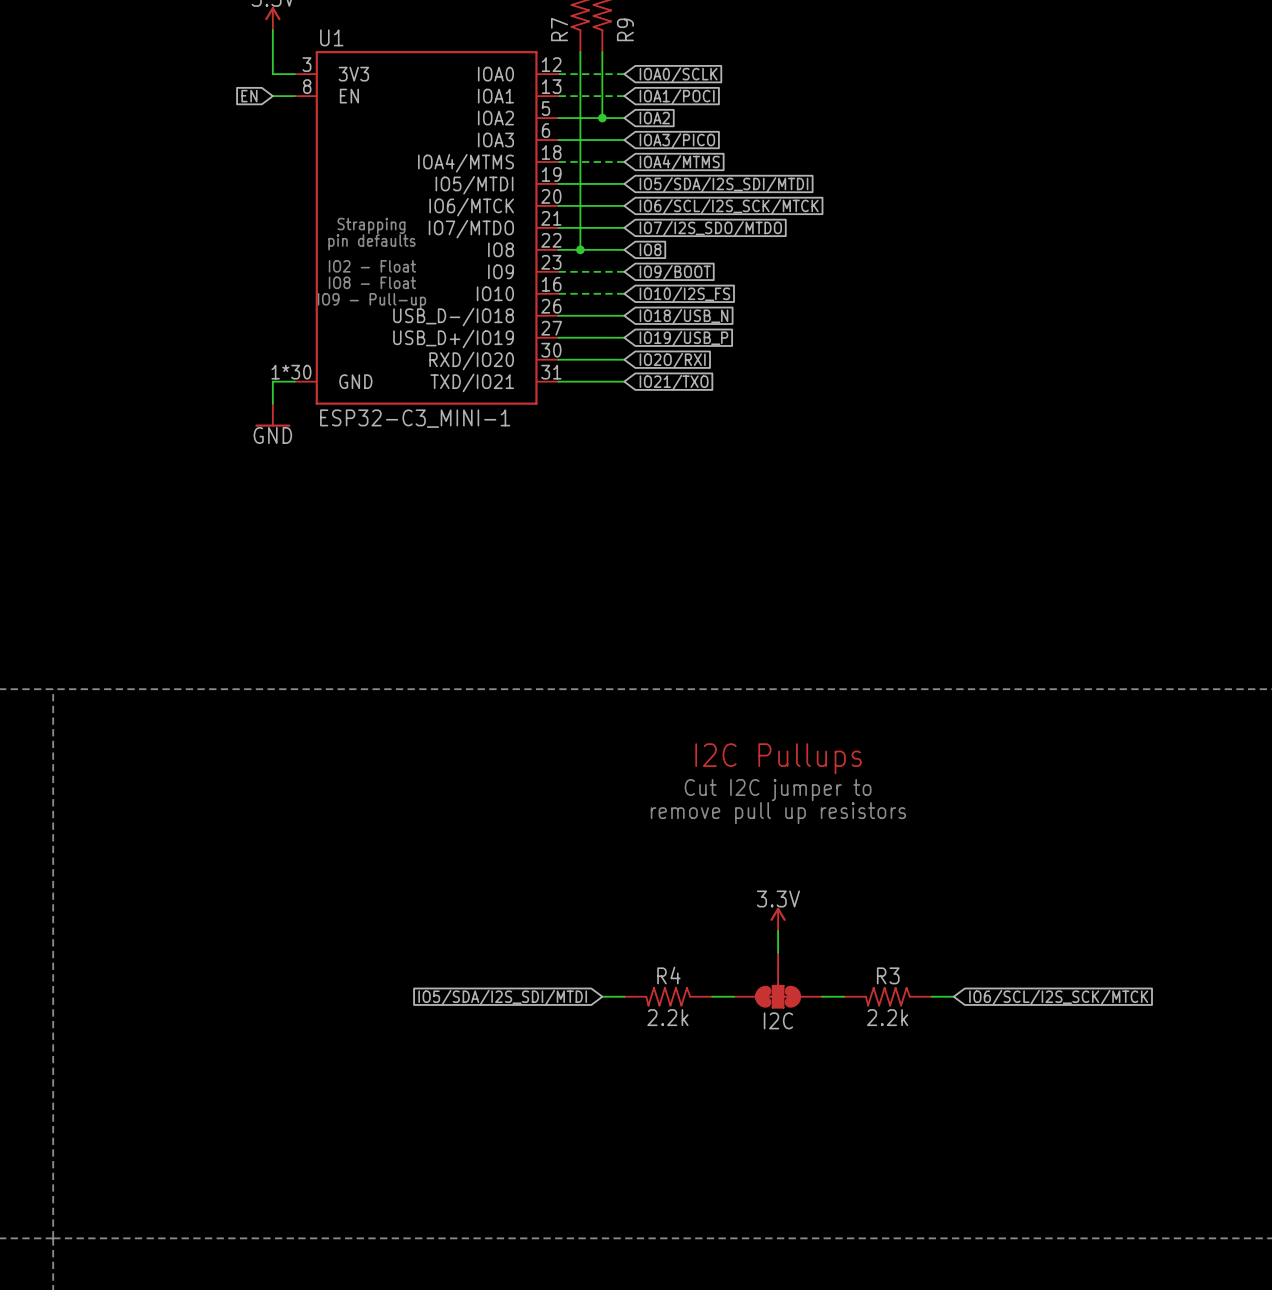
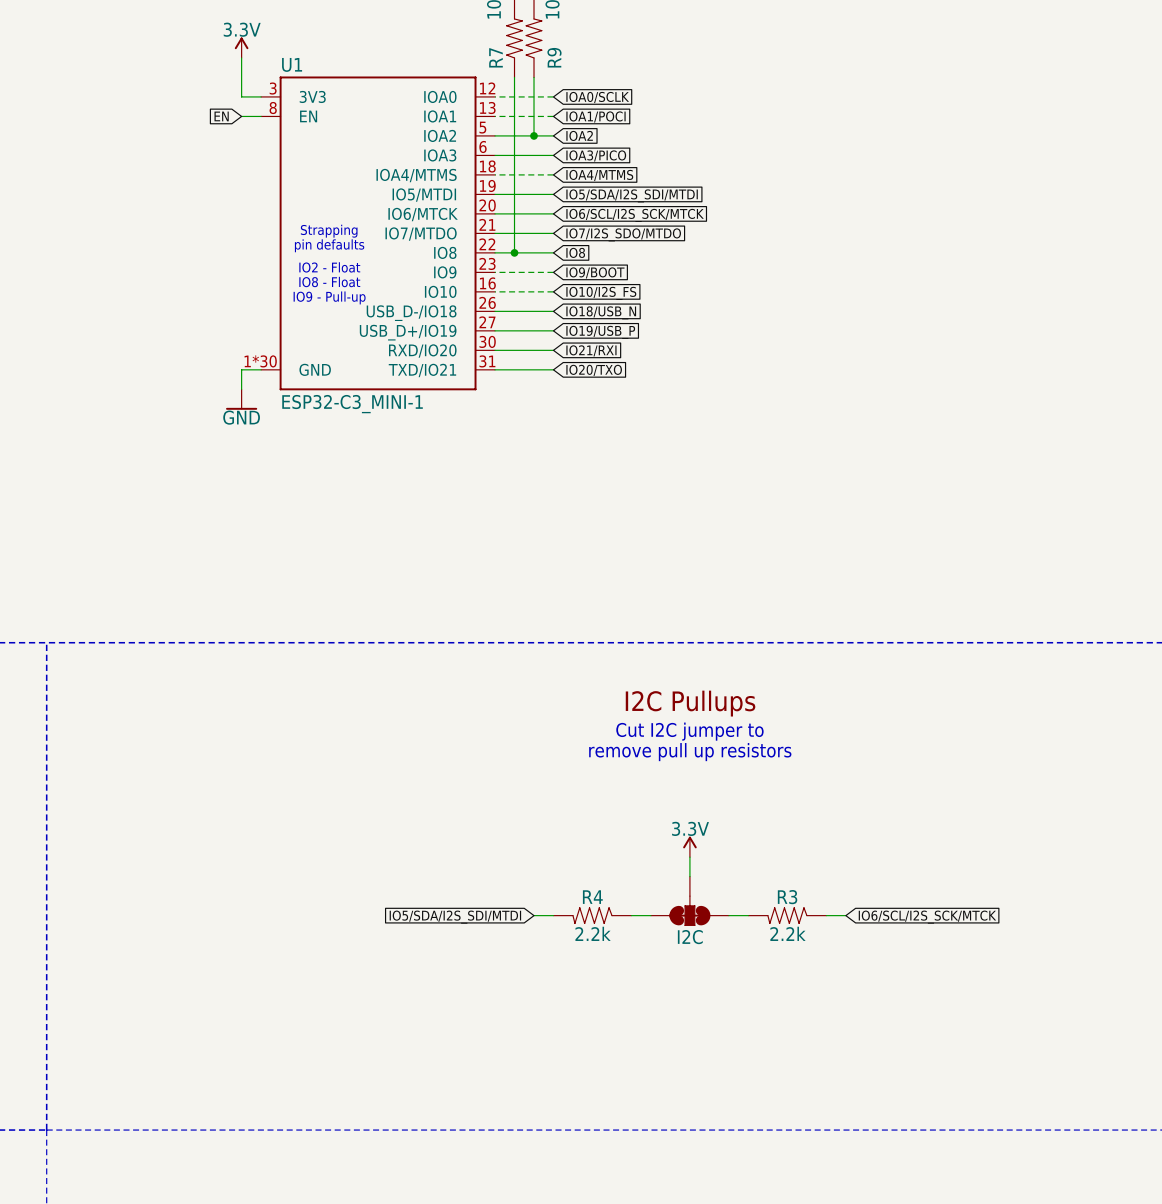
global label: IO2O/RXI (672, 360) -> IO21/RXI (591, 350)
global label: IO21/TXO (674, 382) -> IO20/TXO (594, 370)

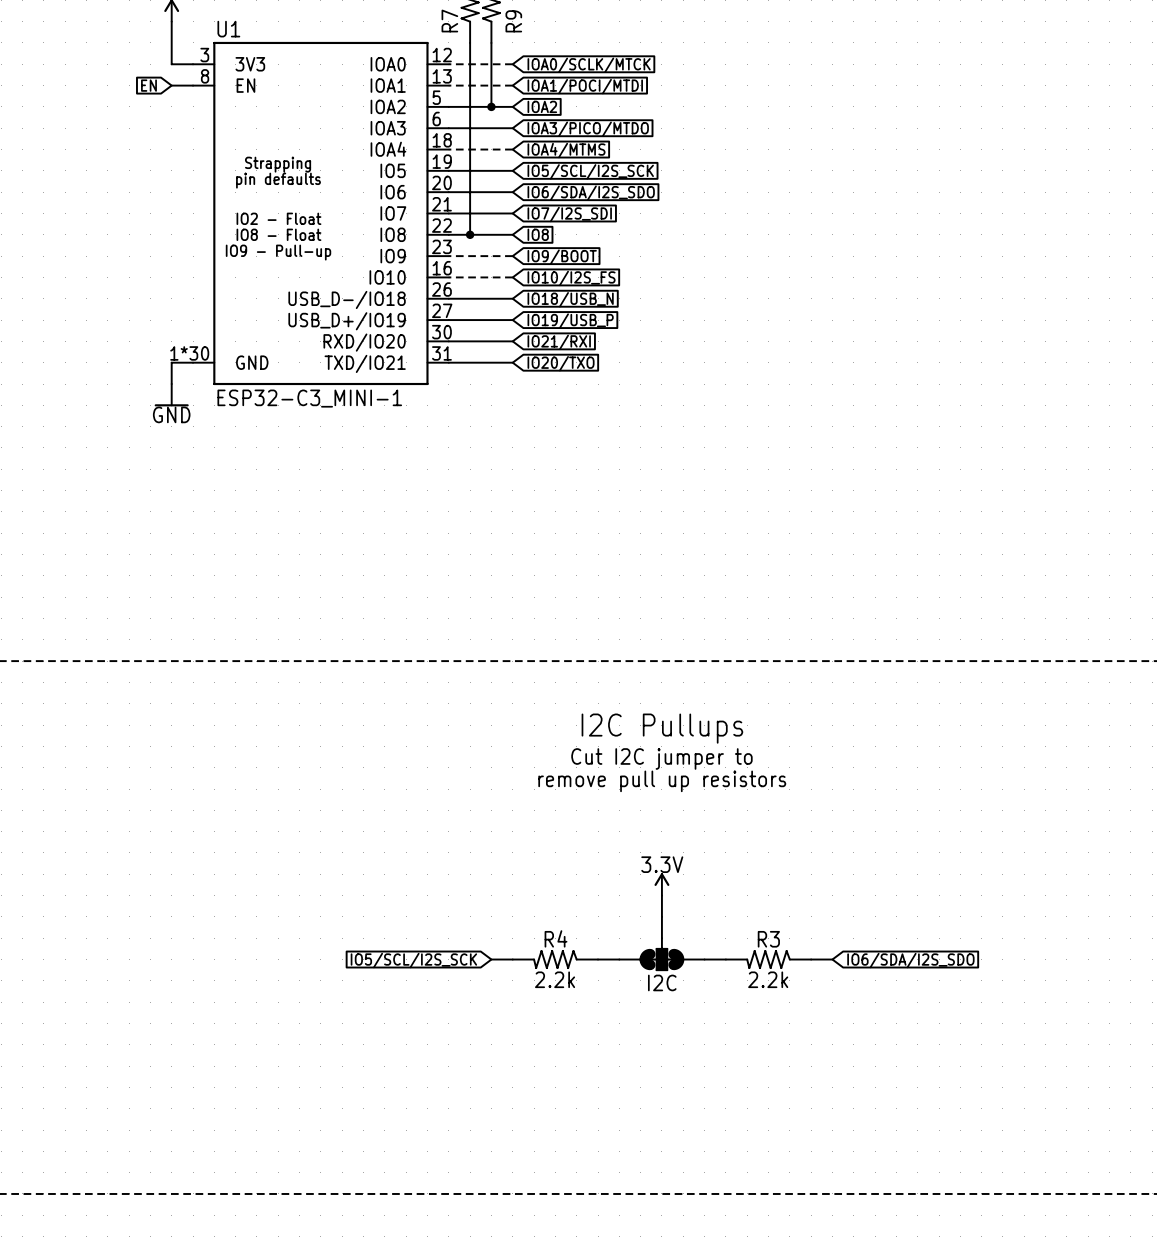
U1 symbol: [261, 76, 496, 391] -> [193, 41, 449, 386]
global label: IOA0/SCLK (597, 97) -> IOA0/SCLK/MTCK (589, 65)
global label: IOA1/POCI (596, 116) -> IOA1/POCI/MTDI (585, 86)
global label: IOA3/PICO (596, 155) -> IOA3/PICO/MTDO (588, 129)
global label: IO5/SDA/I2S_SDI/MTDI (632, 195) -> IO5/SCL/I2S_SCK (590, 171)
global label: IO6/SCL/I2S_SCK/MTCK (635, 215) -> IO6/SDA/I2S_SDO (591, 193)
global label: IO7/I2S_SDO/MTDO (623, 234) -> IO7/I2S_SDI (569, 214)
global label: IO5/SDA/I2S_SDI/MTDI (455, 917) -> IO5/SCL/I2S_SCK (413, 960)
global label: IO6/SCL/I2S_SCK/MTCK (927, 917) -> IO6/SDA/I2S_SDO (910, 960)

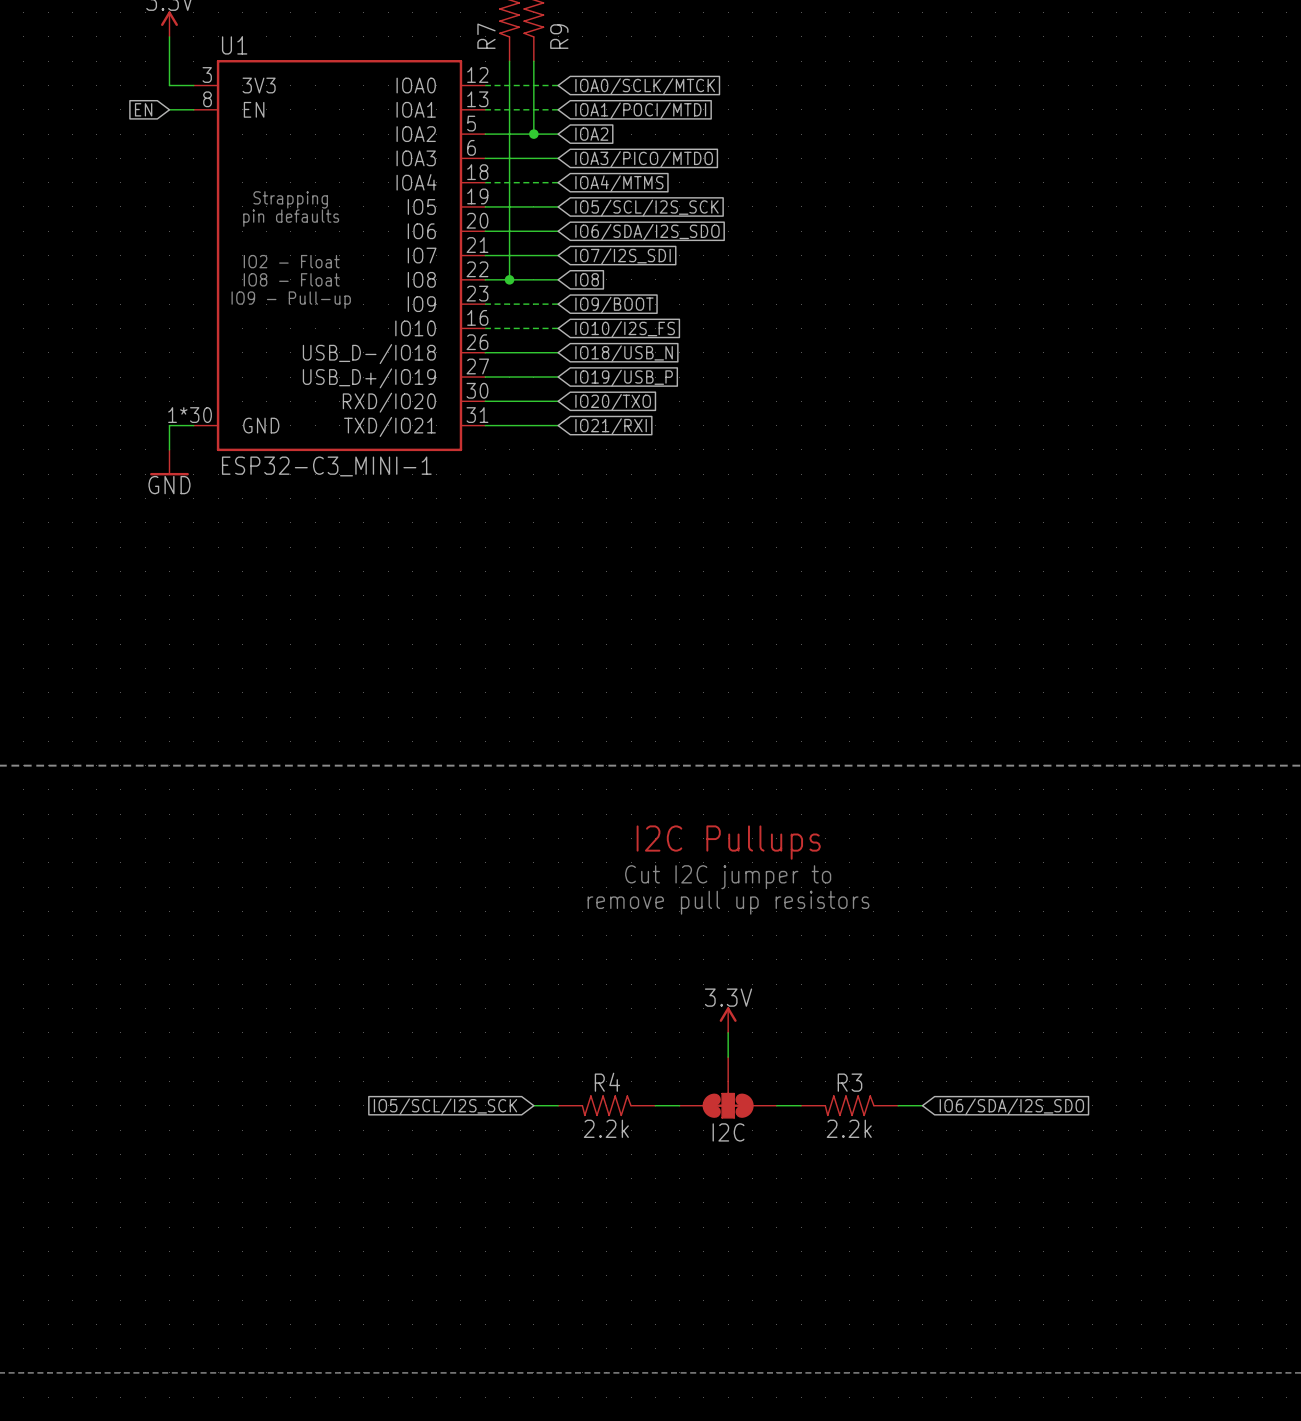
global label: IO21/RXI (559, 342) -> IO20/TXO (613, 402)
global label: IO20/TXO (561, 363) -> IO21/RXI (611, 426)

